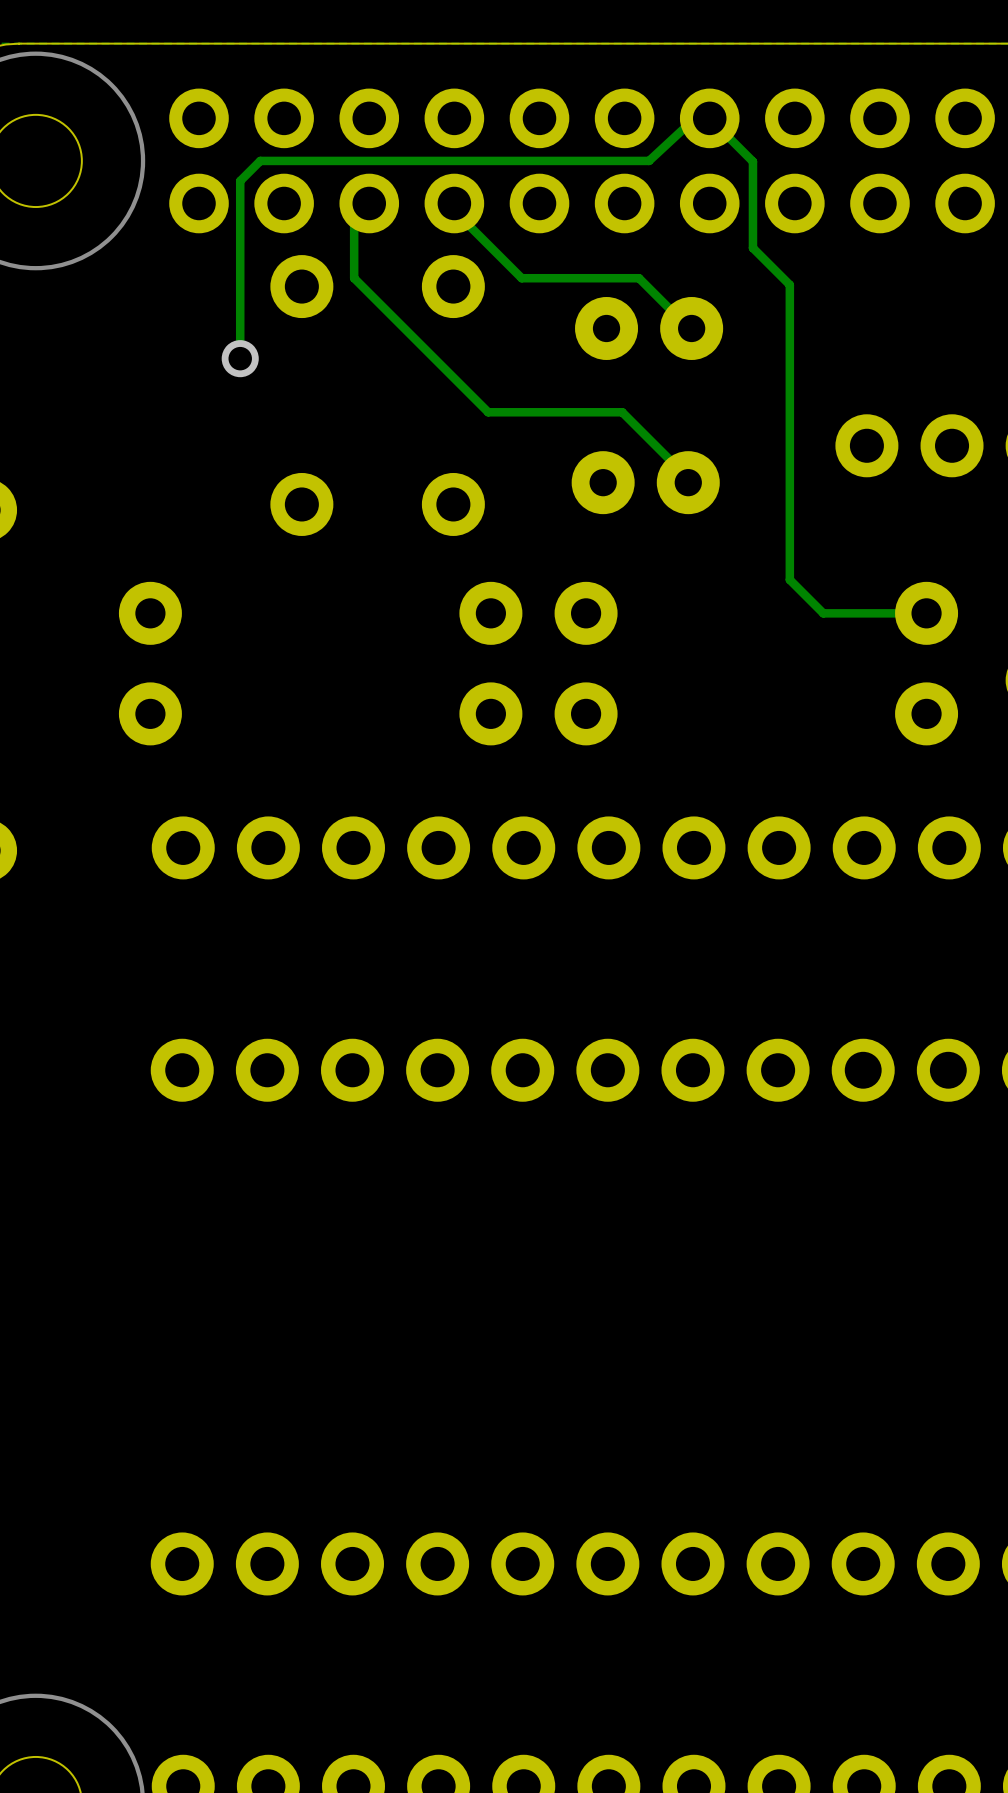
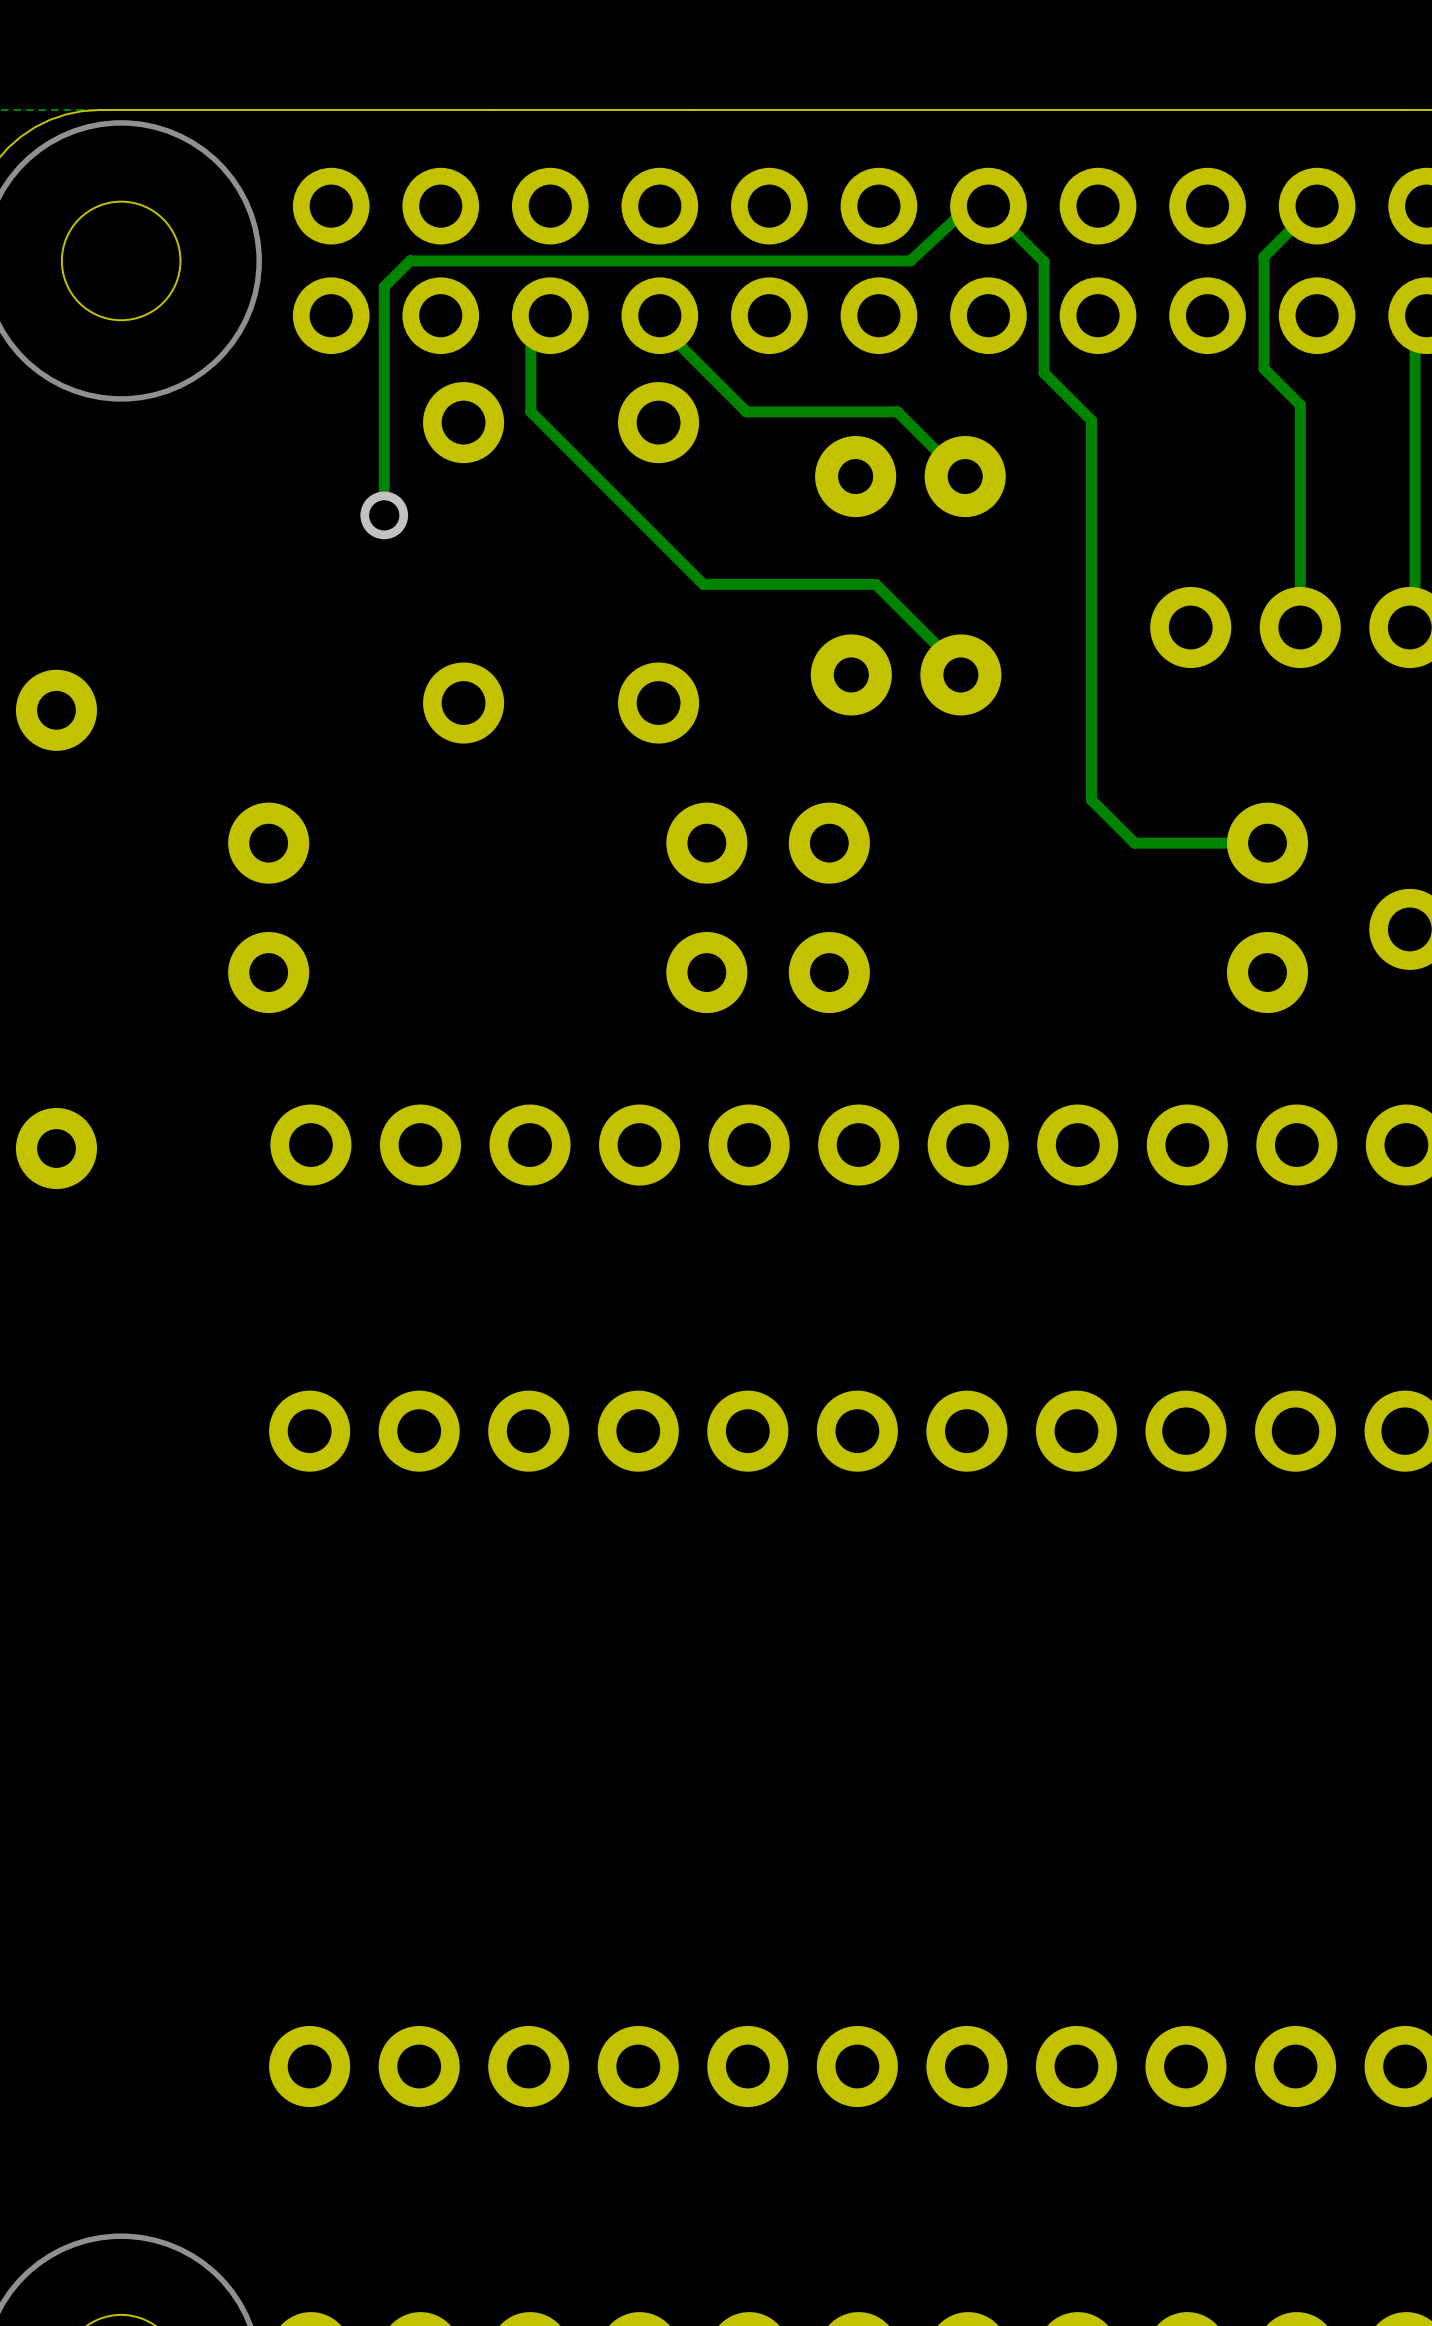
track: none -> (1317, 206) (1307, 213) (1264, 256) (1264, 368) (1300, 404) (1300, 627)

